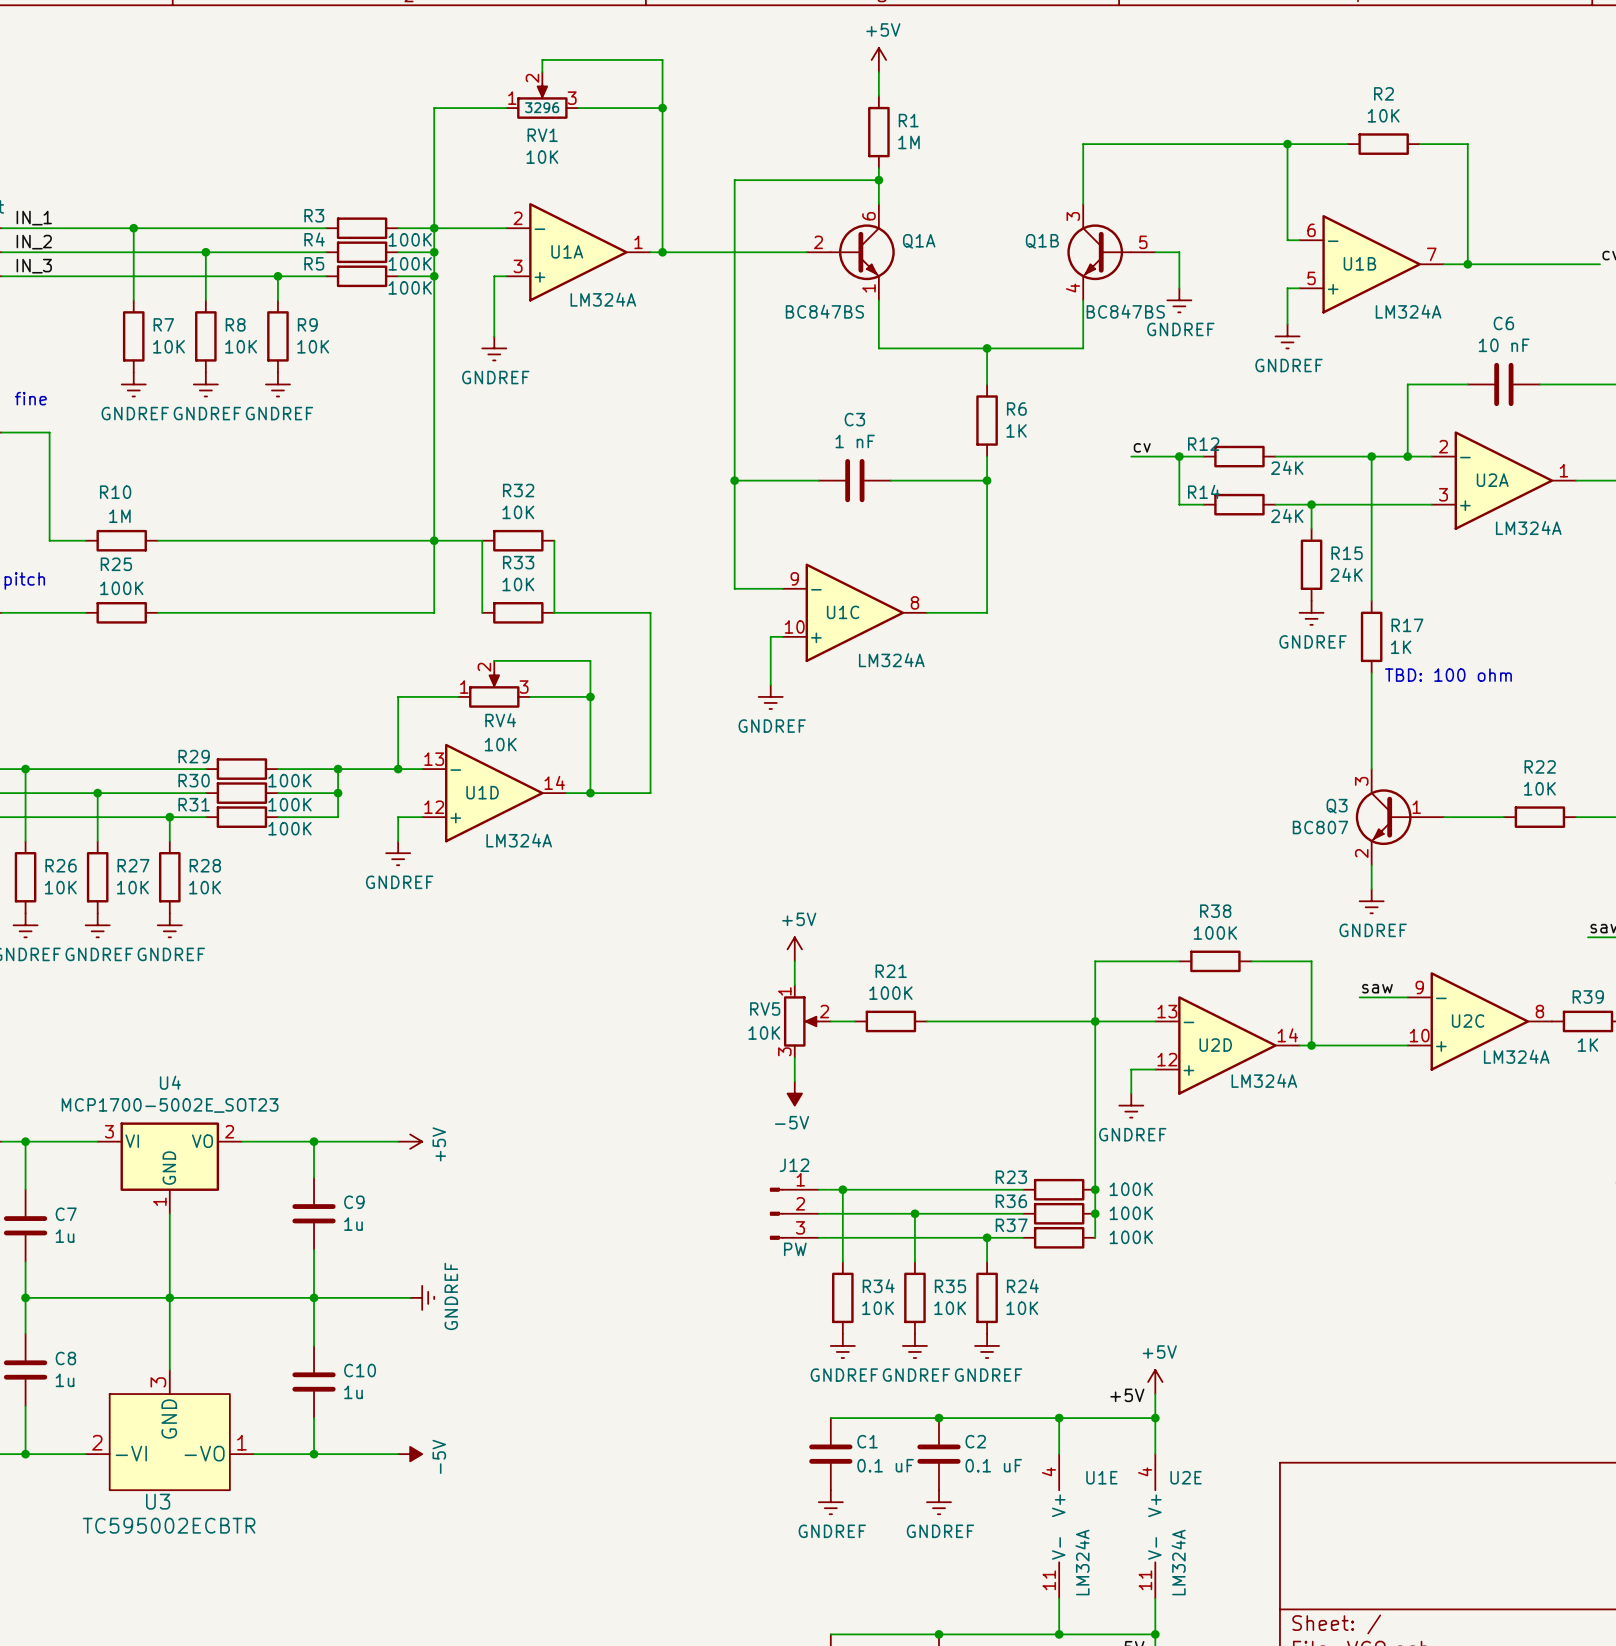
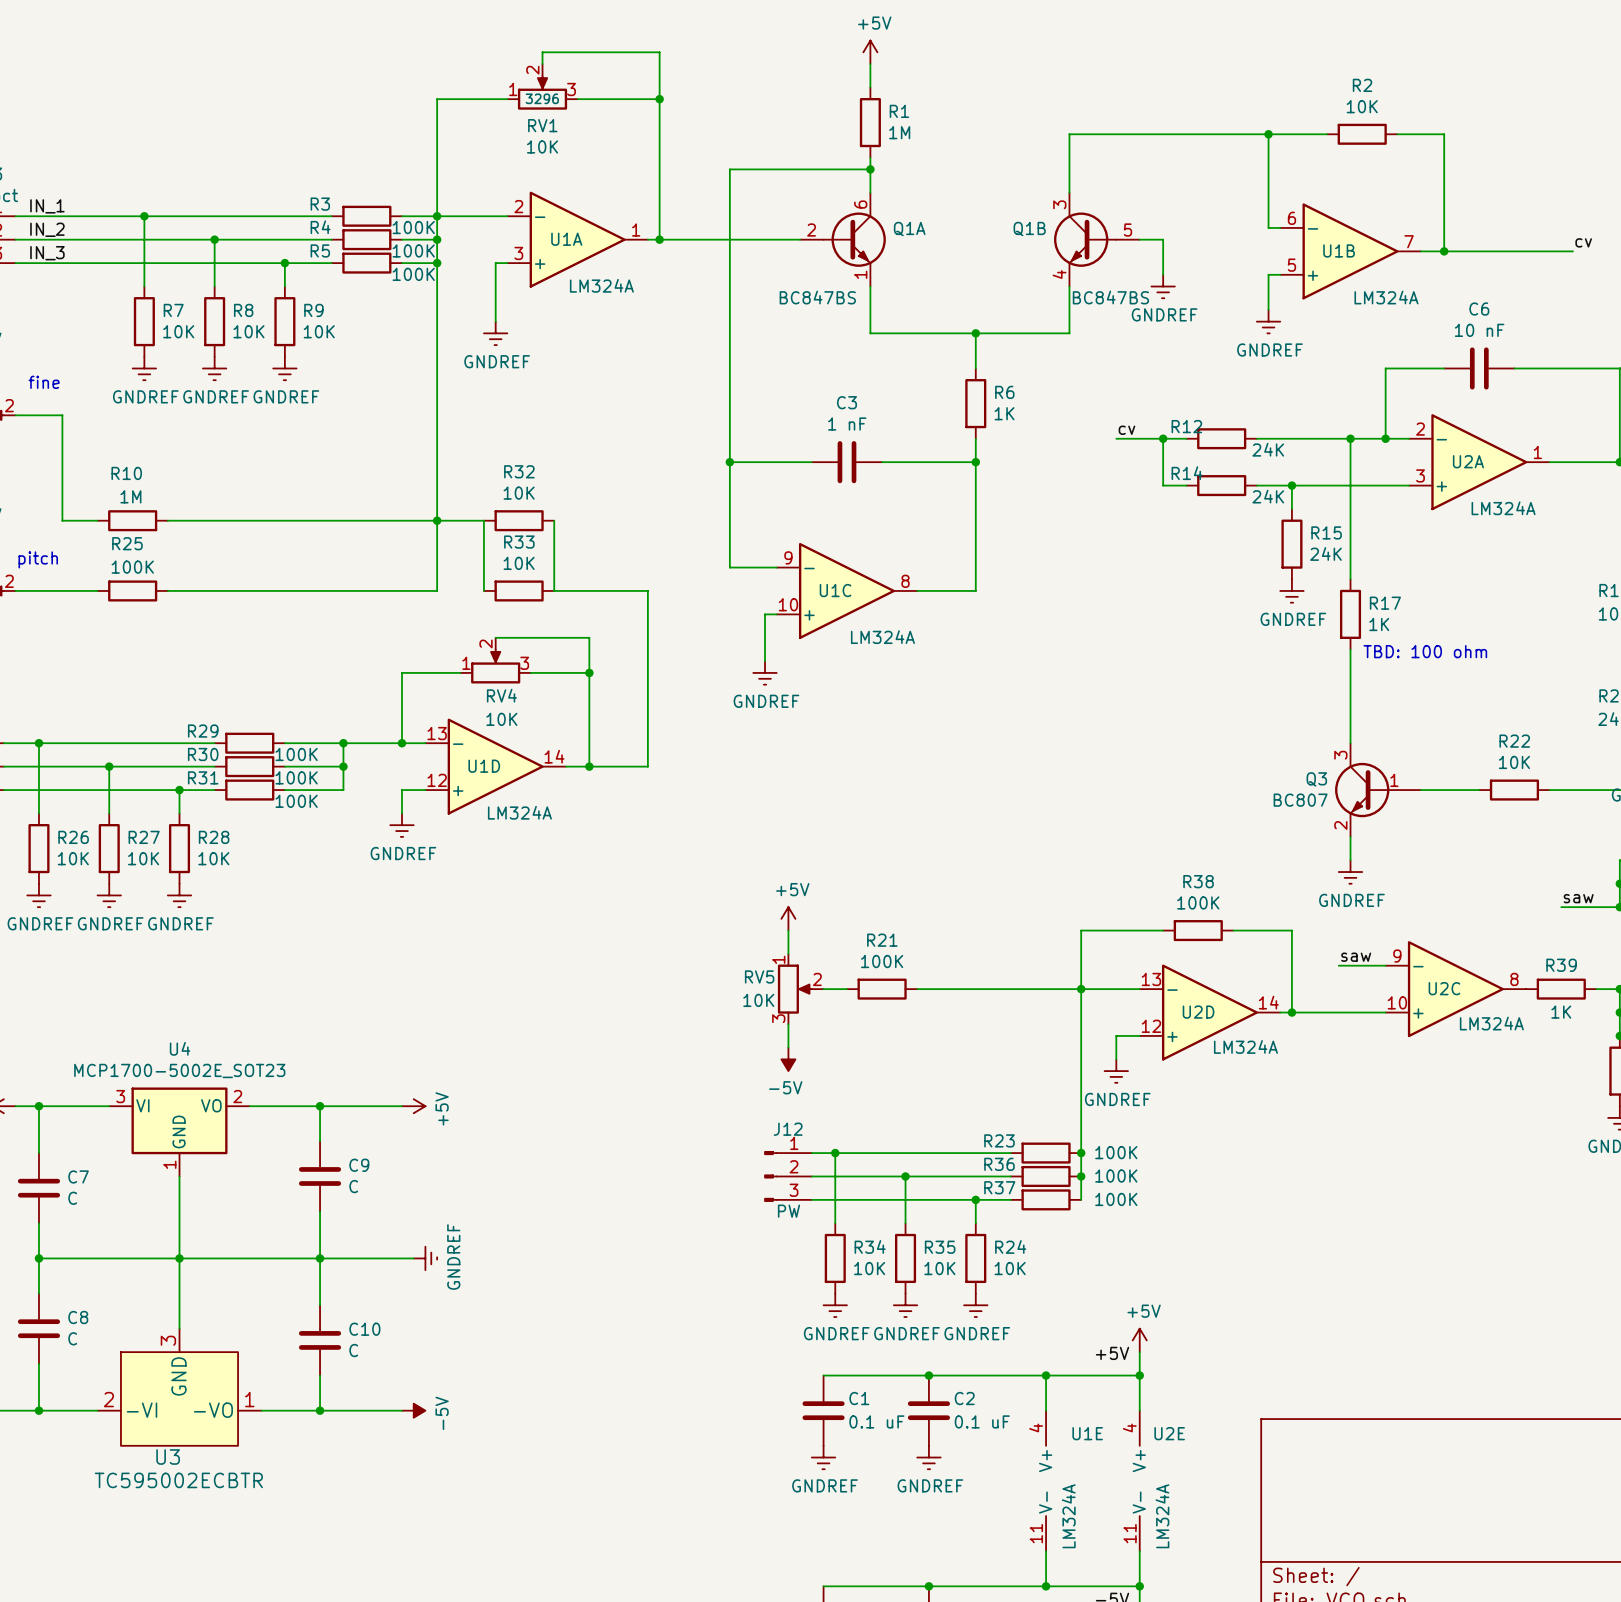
C9 value: 1u (353, 1224) -> C (353, 1186)
C7 value: 1u (65, 1236) -> C (72, 1198)
C8 value: 1u (65, 1380) -> C (72, 1338)
C10 value: 1u (353, 1392) -> C (353, 1350)

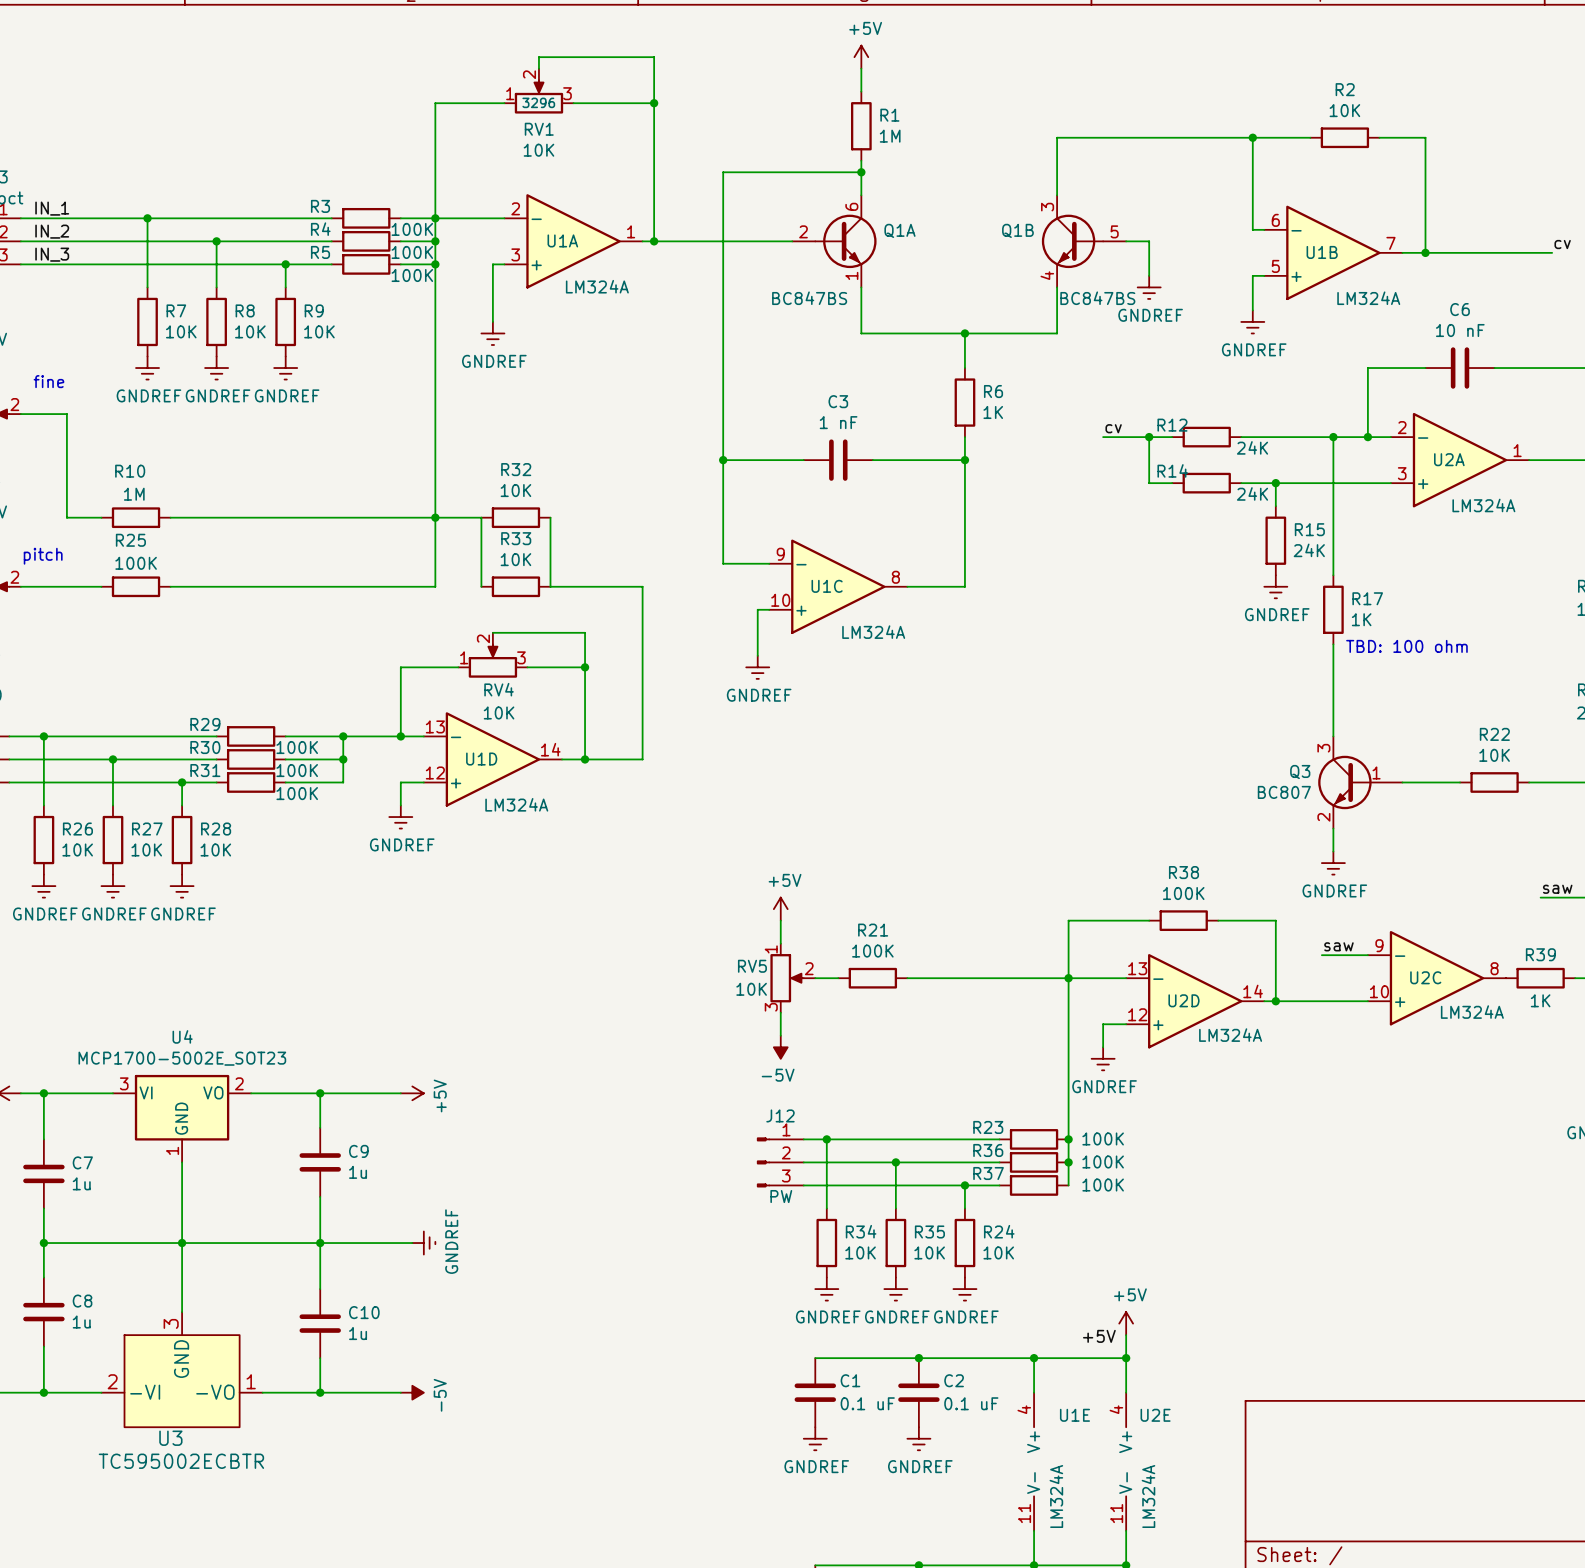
C9 value: C (353, 1186) -> 1u (358, 1172)
C7 value: C (72, 1198) -> 1u (81, 1183)
C8 value: C (72, 1338) -> 1u (81, 1322)
C10 value: C (353, 1350) -> 1u (358, 1333)

